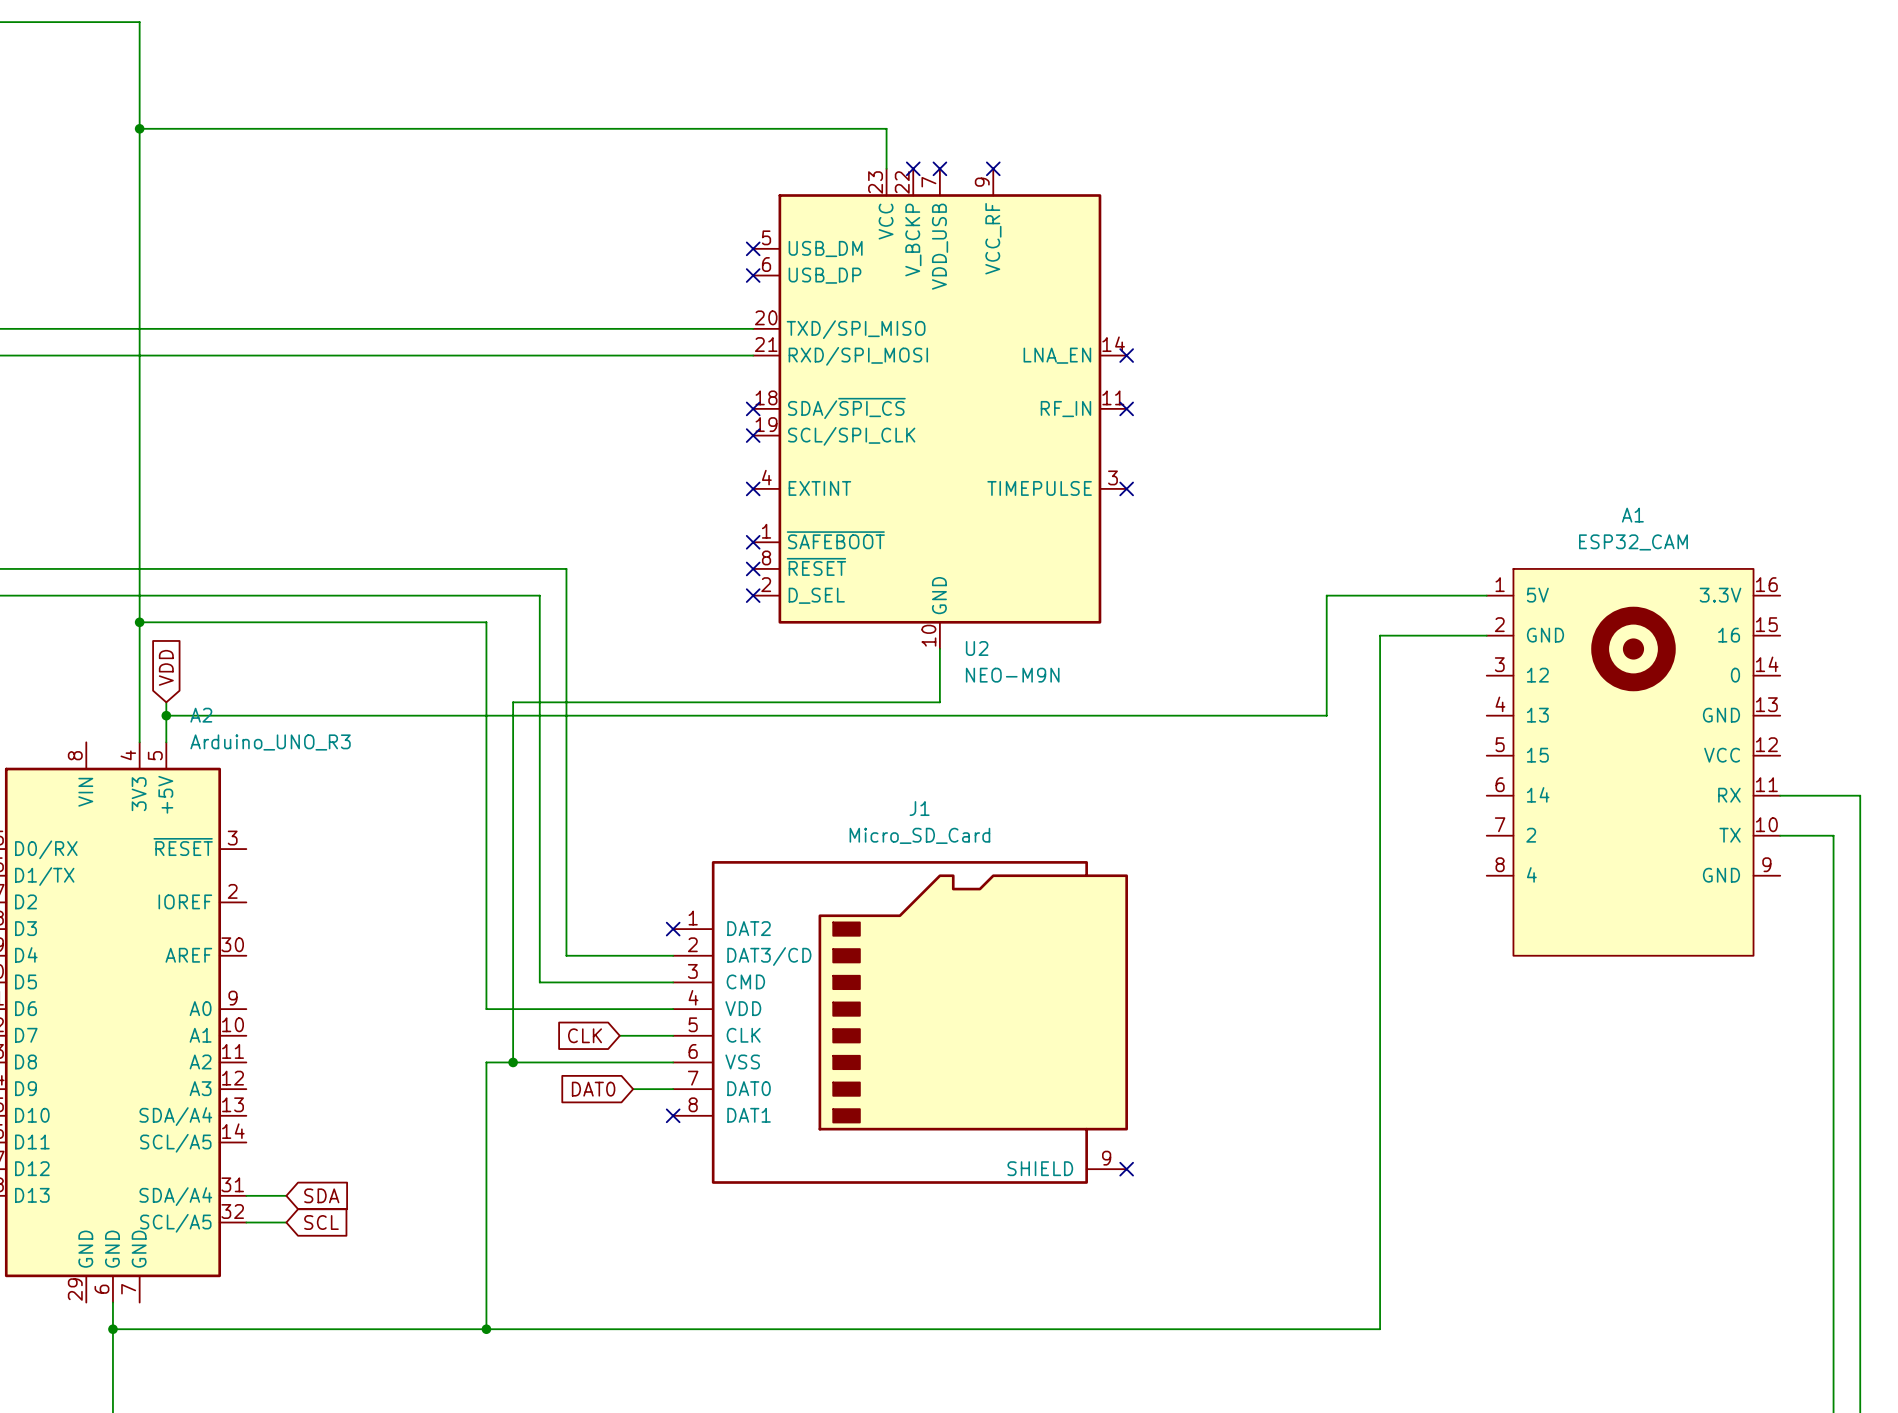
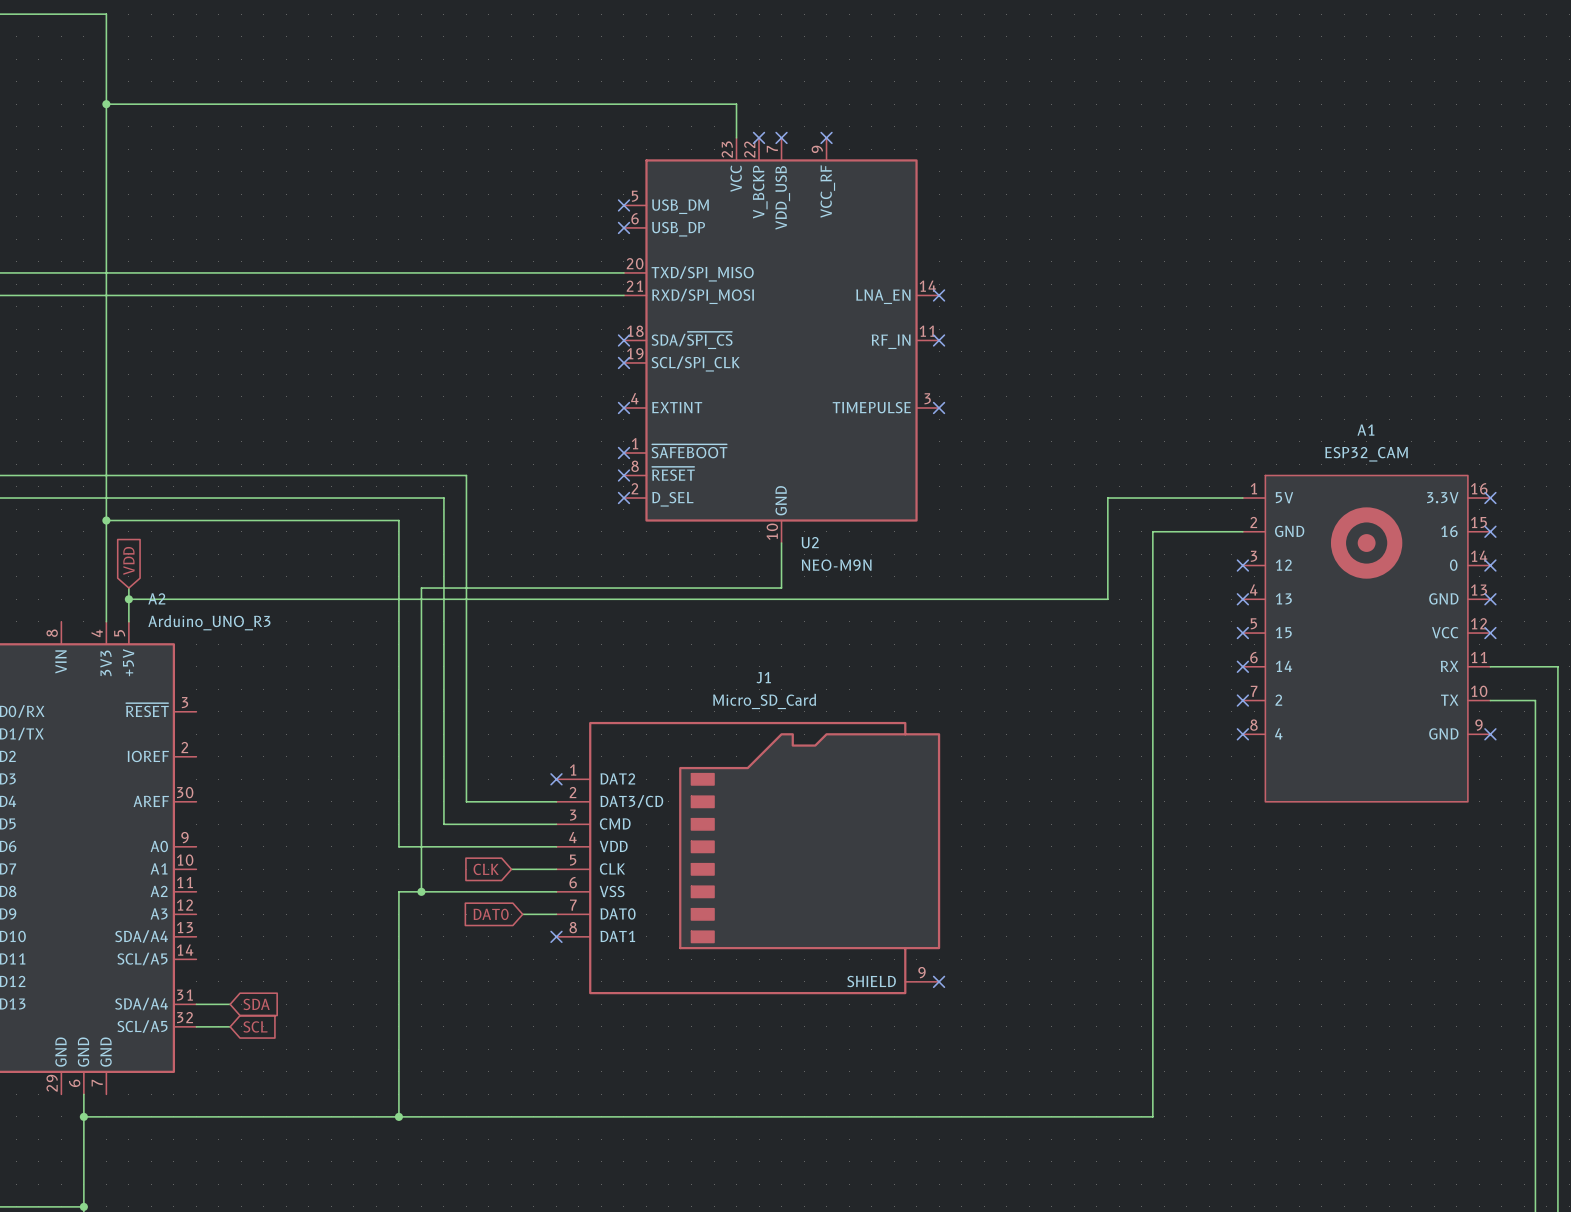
no-connect mark: none -> (1490, 498)
no-connect mark: none -> (1490, 531)
no-connect mark: none -> (1242, 565)
no-connect mark: none -> (1490, 565)
no-connect mark: none -> (1242, 599)
no-connect mark: none -> (1490, 599)
no-connect mark: none -> (1242, 633)
no-connect mark: none -> (1490, 633)
no-connect mark: none -> (1242, 666)
no-connect mark: none -> (1242, 700)
no-connect mark: none -> (1242, 734)
no-connect mark: none -> (1490, 734)

